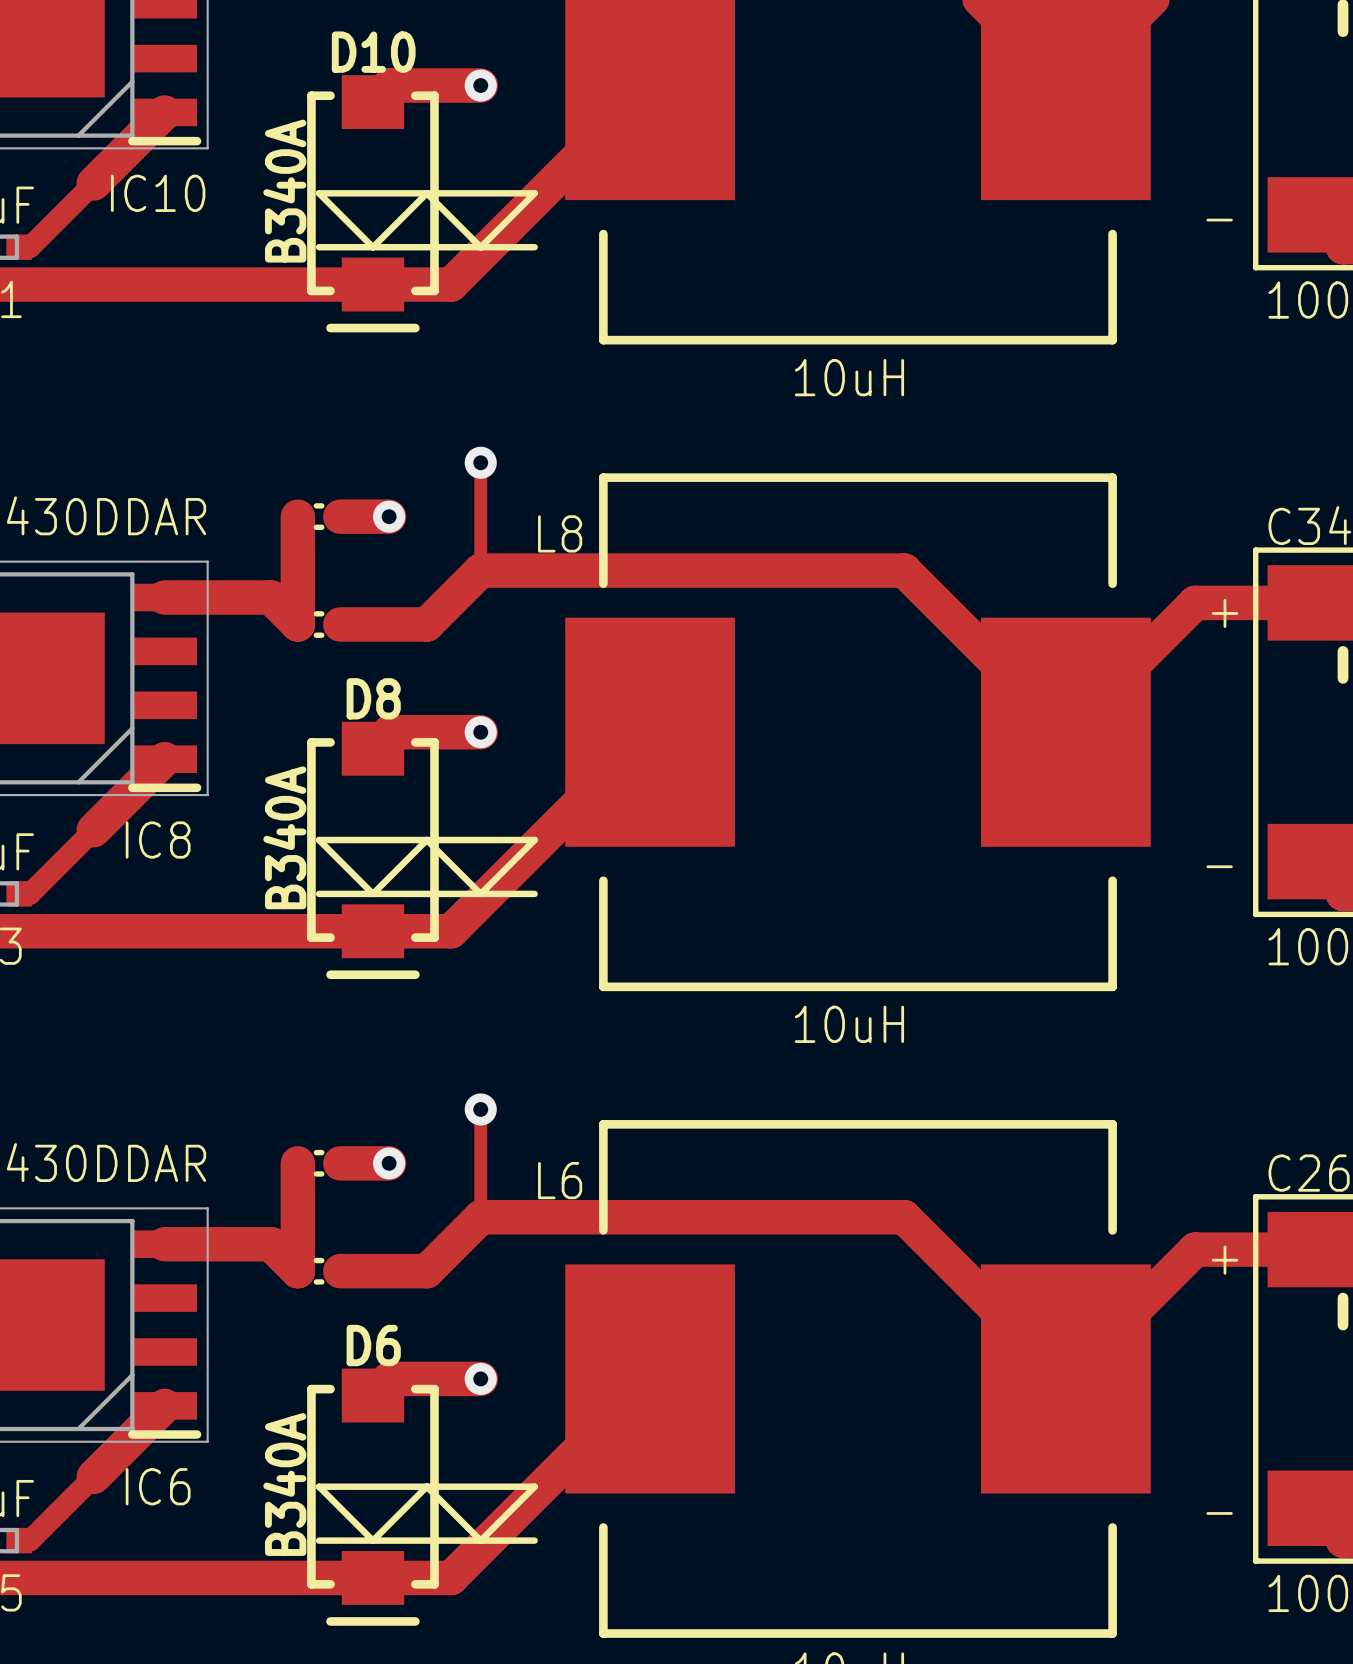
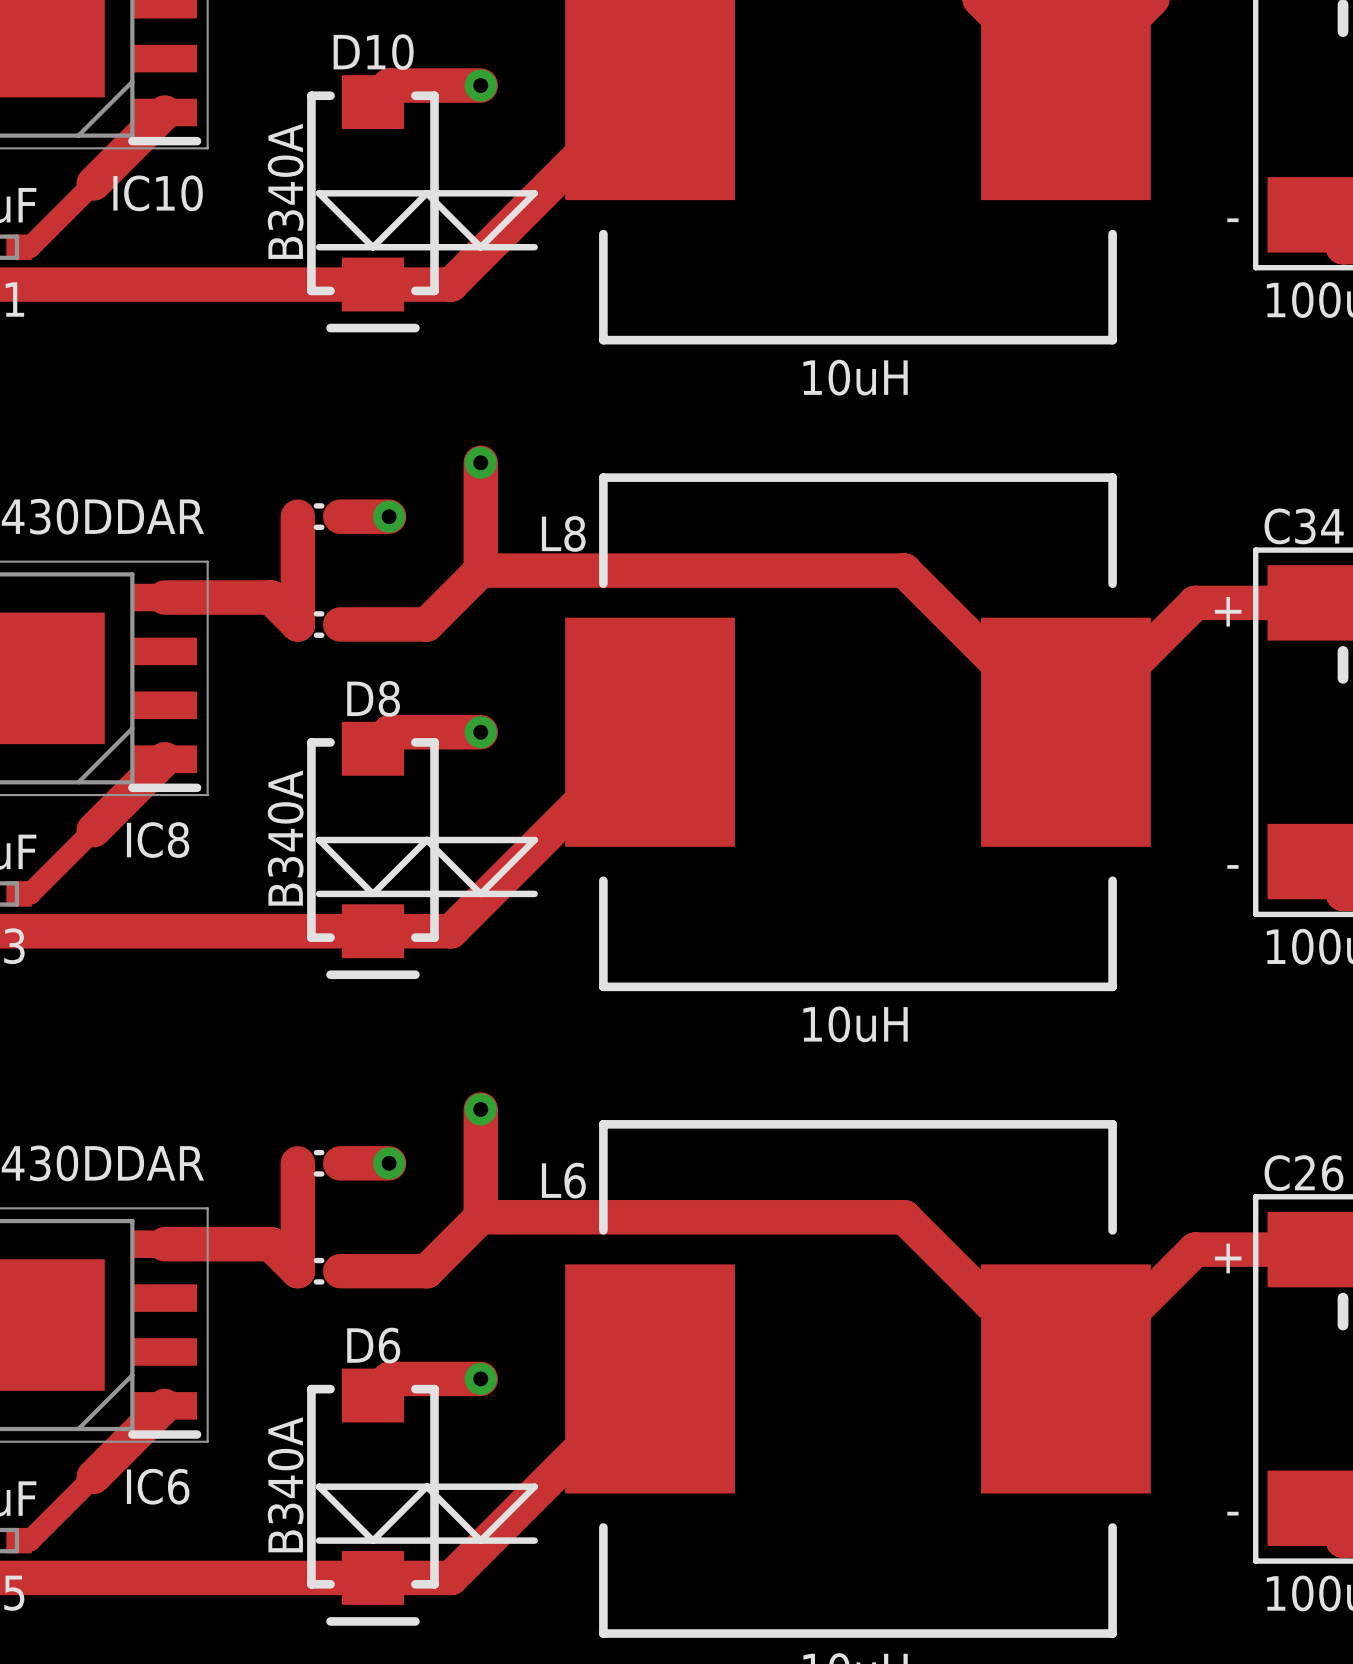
track width: thin (480, 462) (480, 570) -> thick (480, 462) (480, 570)
track width: thin (480, 1109) (480, 1217) -> thick (480, 1109) (480, 1217)

